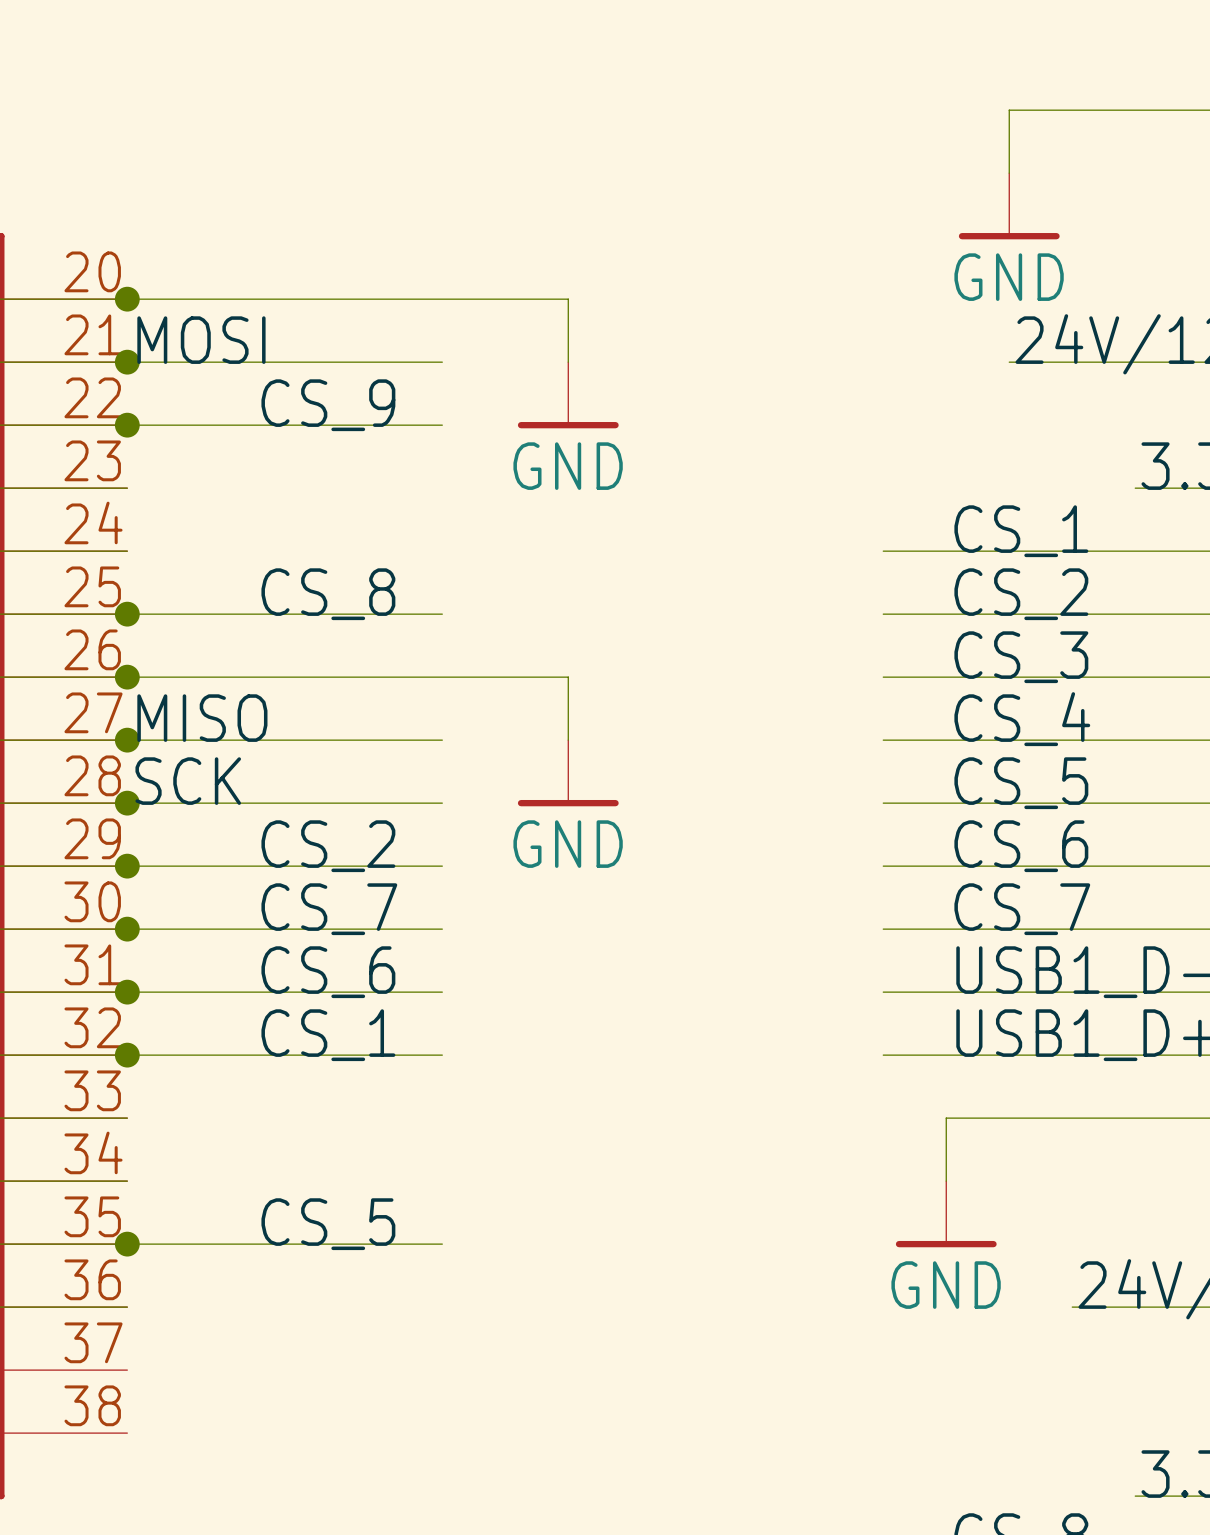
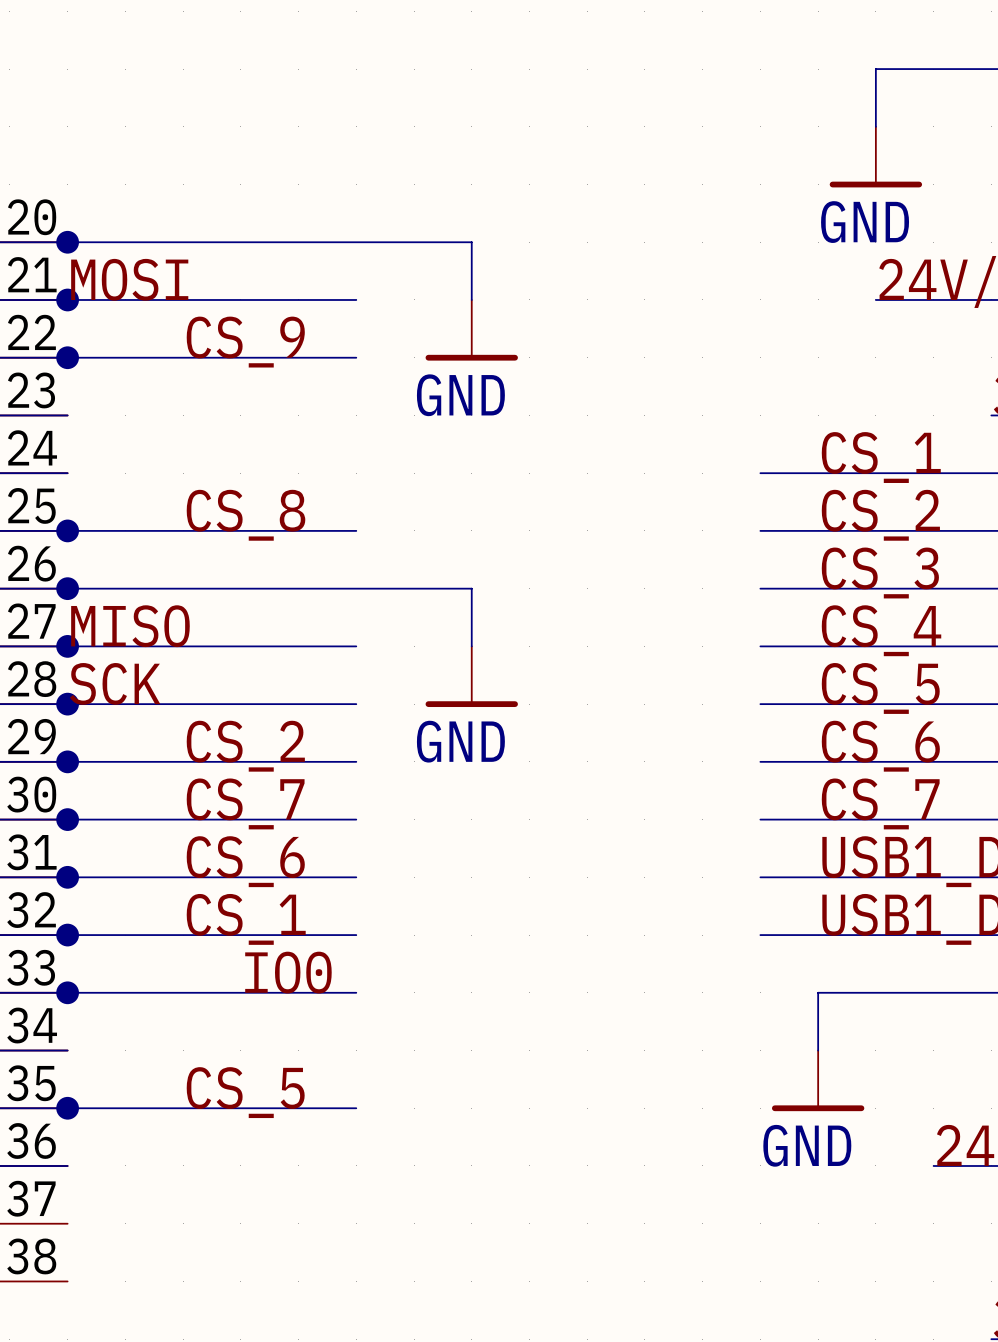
label: none -> IO0 (288, 972)
wire: none -> (67, 992) (356, 992)
junction: none -> (67, 992)

